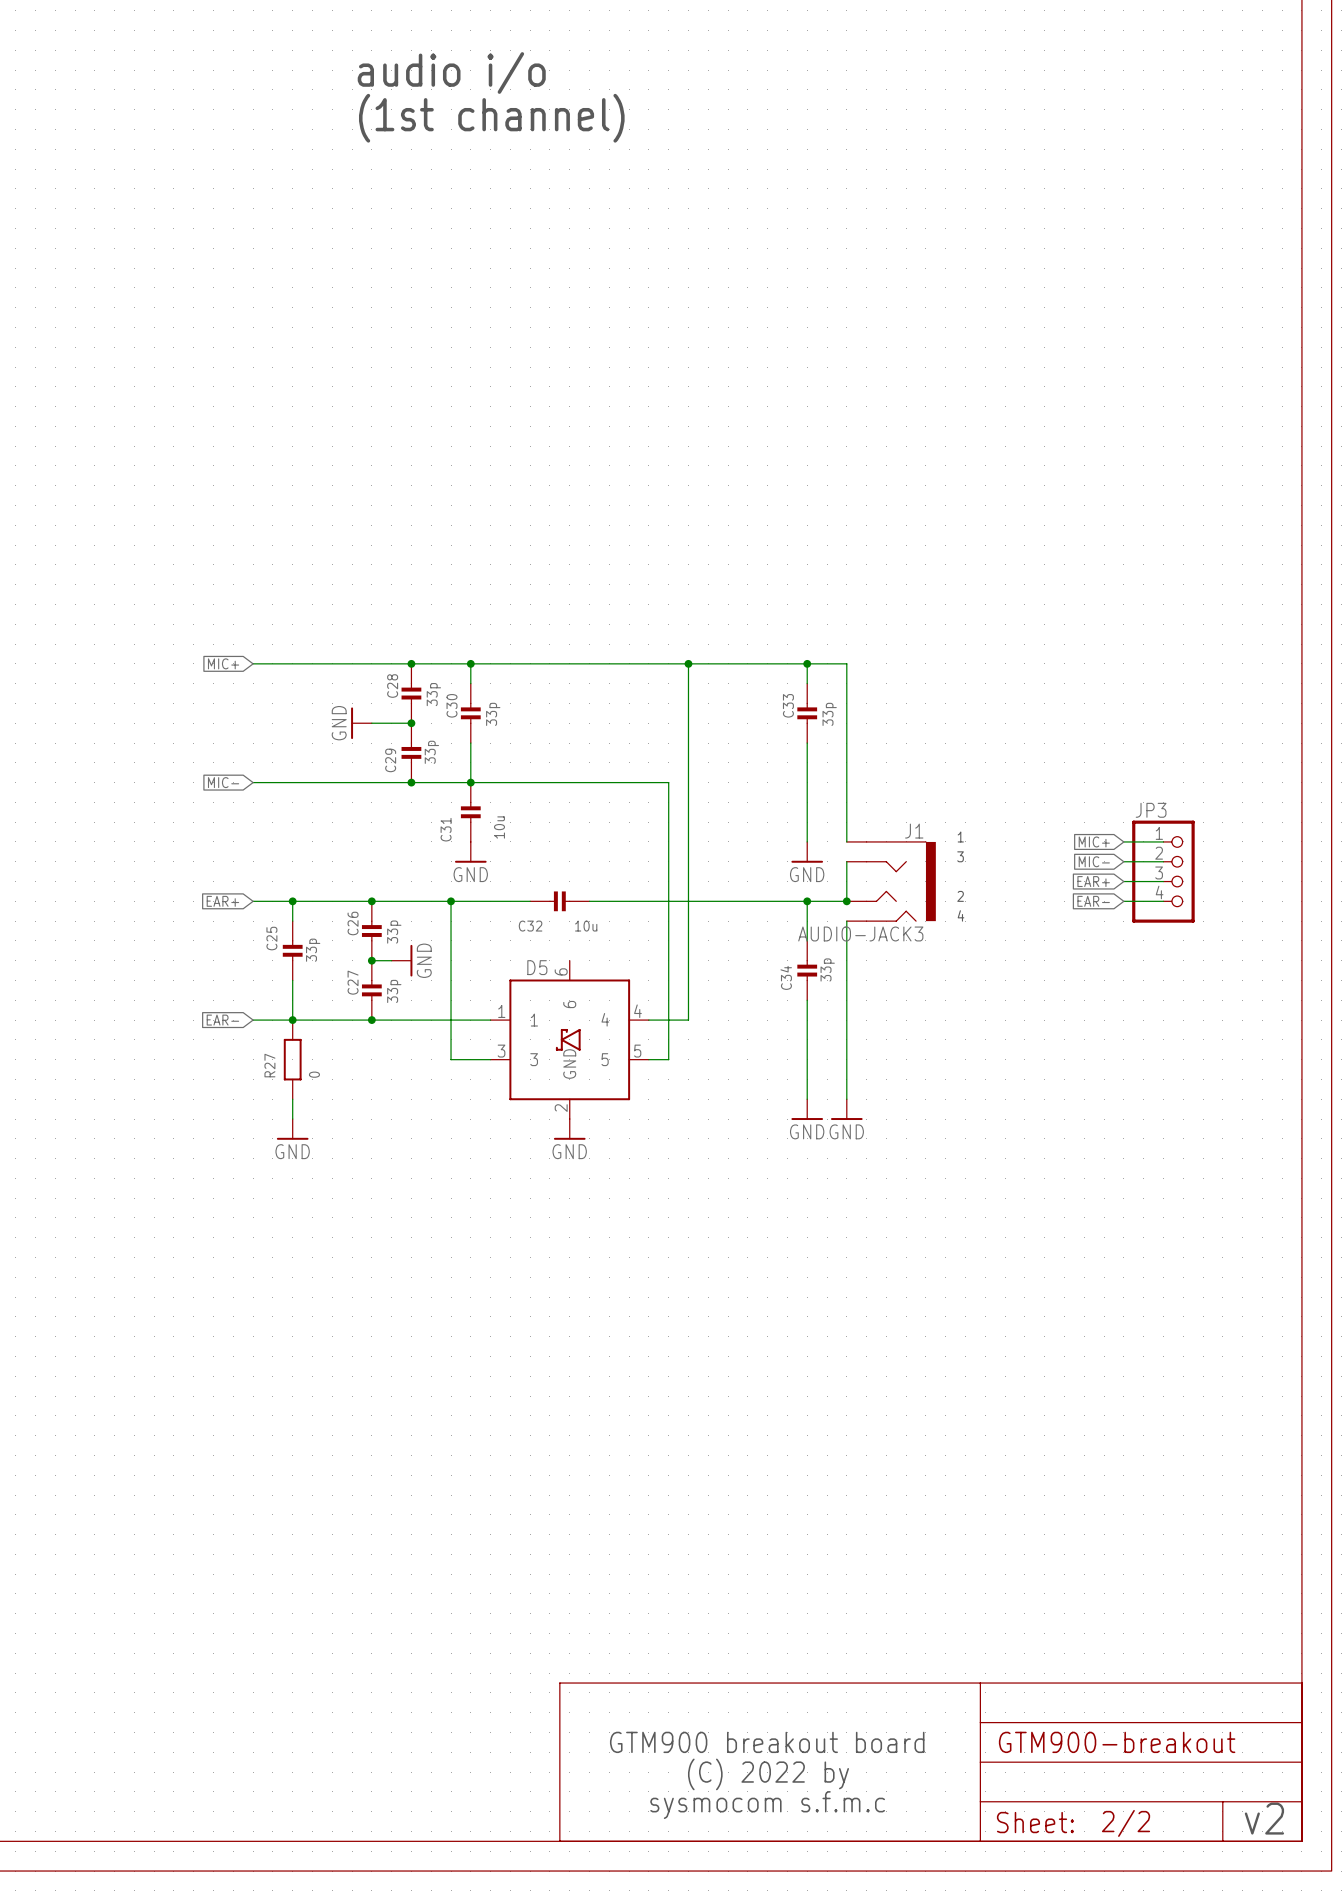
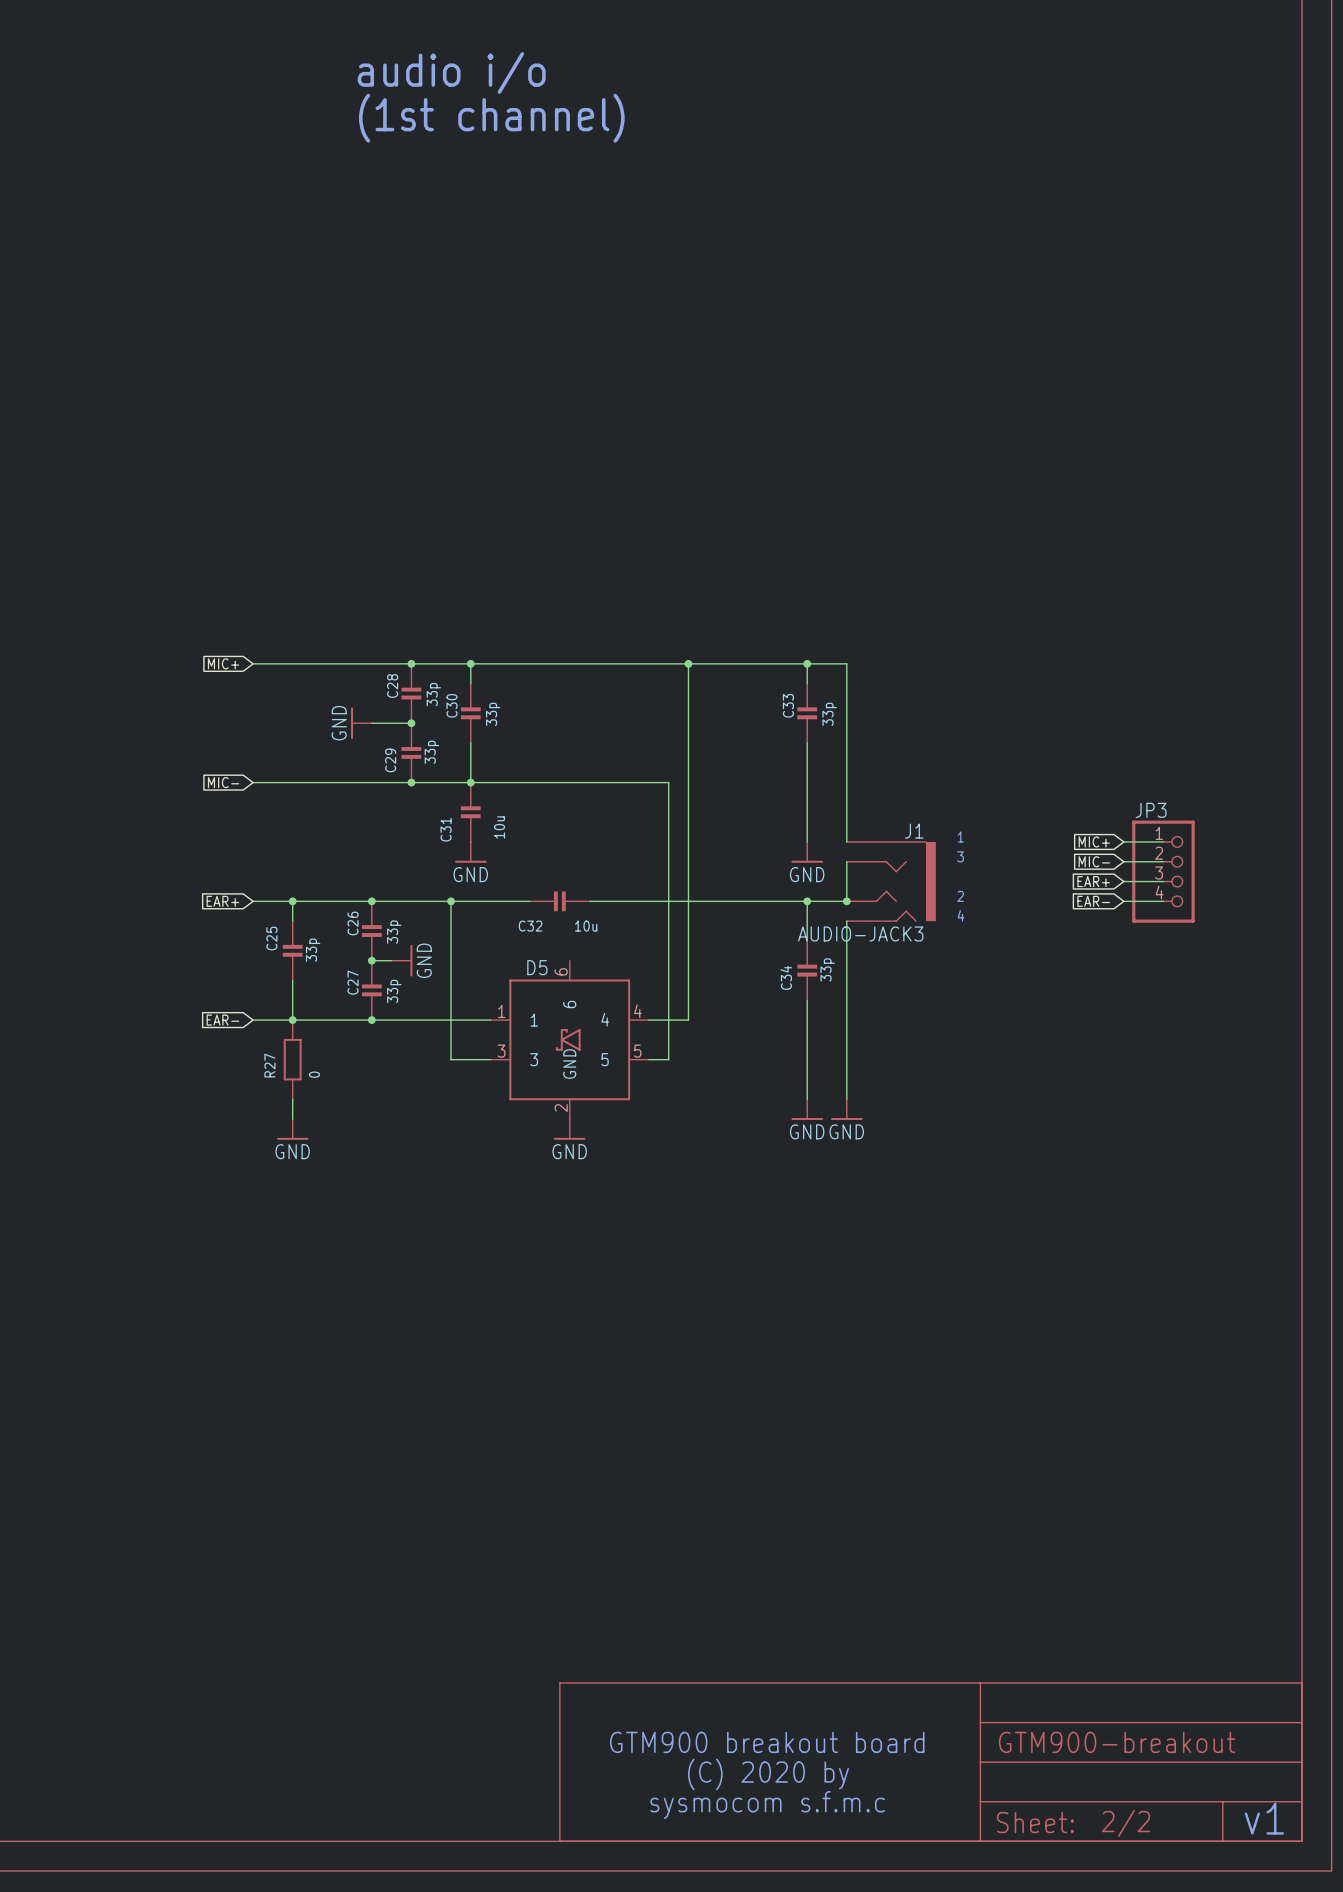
text: (C) 2022 by (768, 1774) -> (C) 2020 by (768, 1774)
text: v2 (1264, 1818) -> v1 (1264, 1818)

